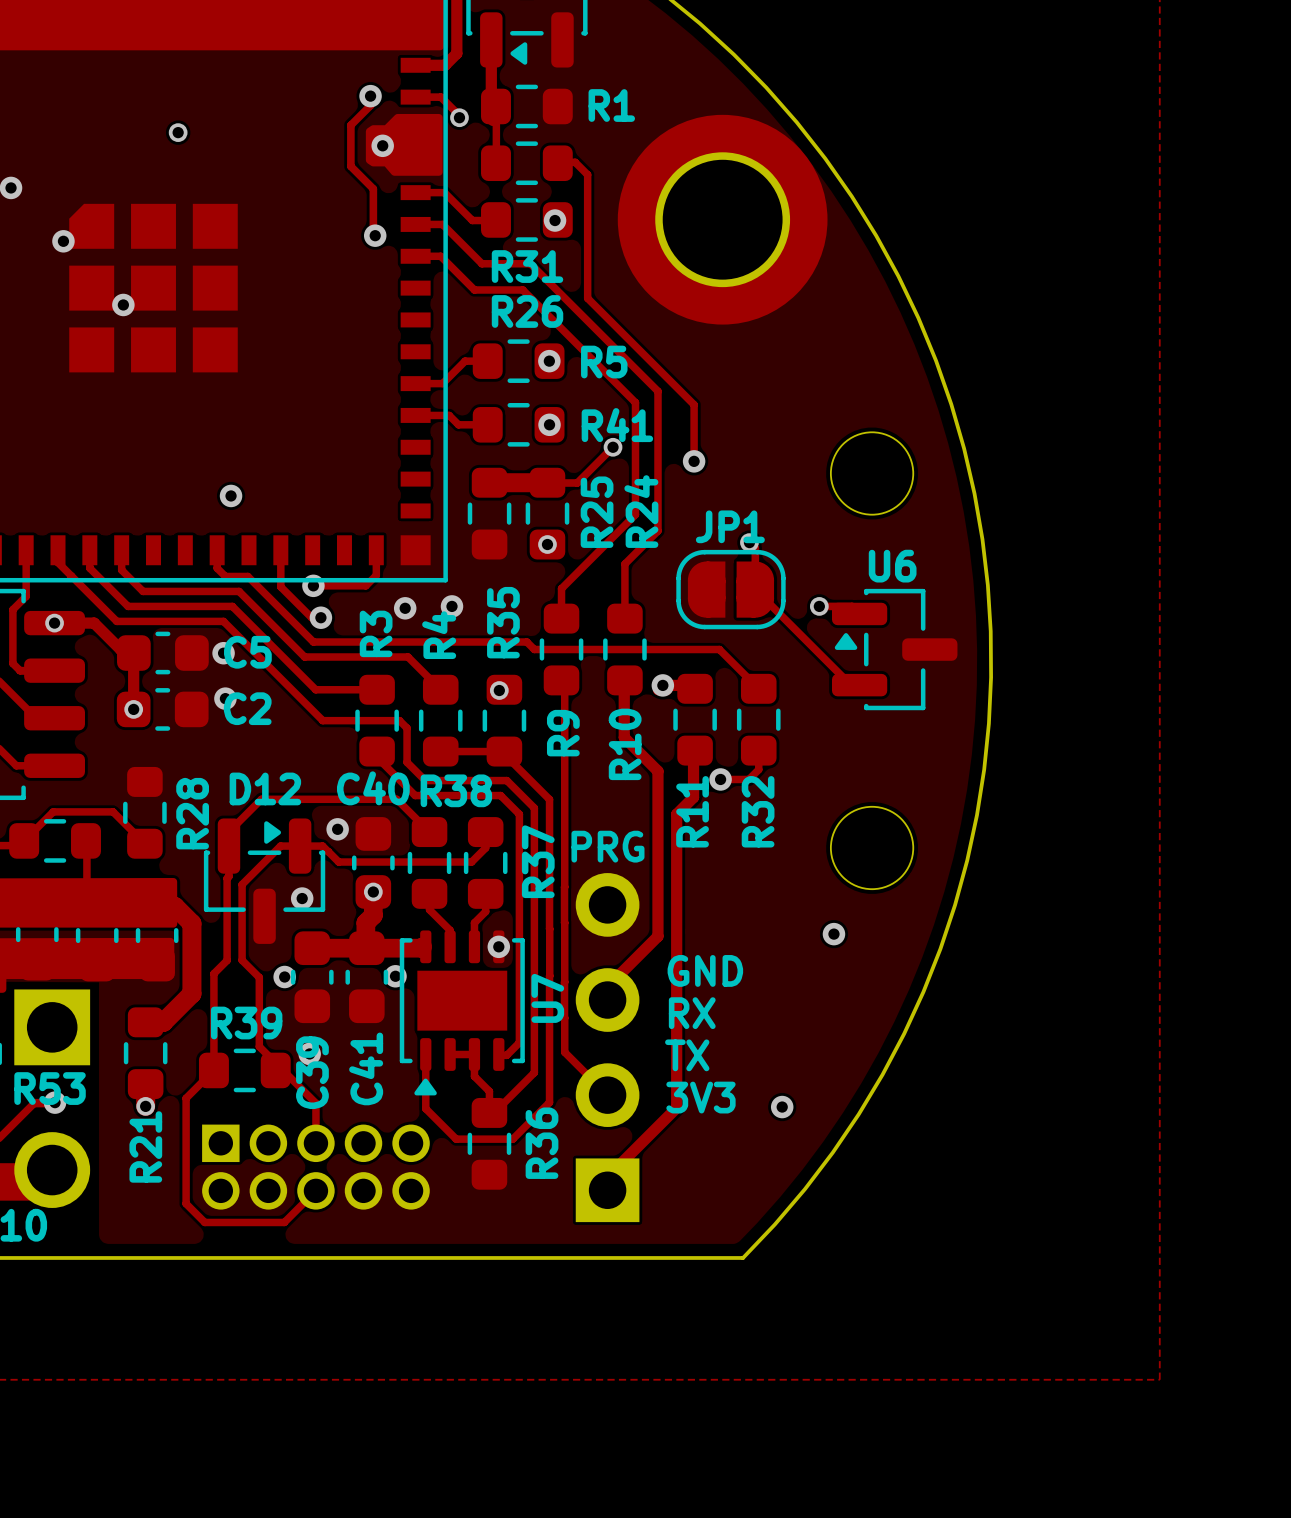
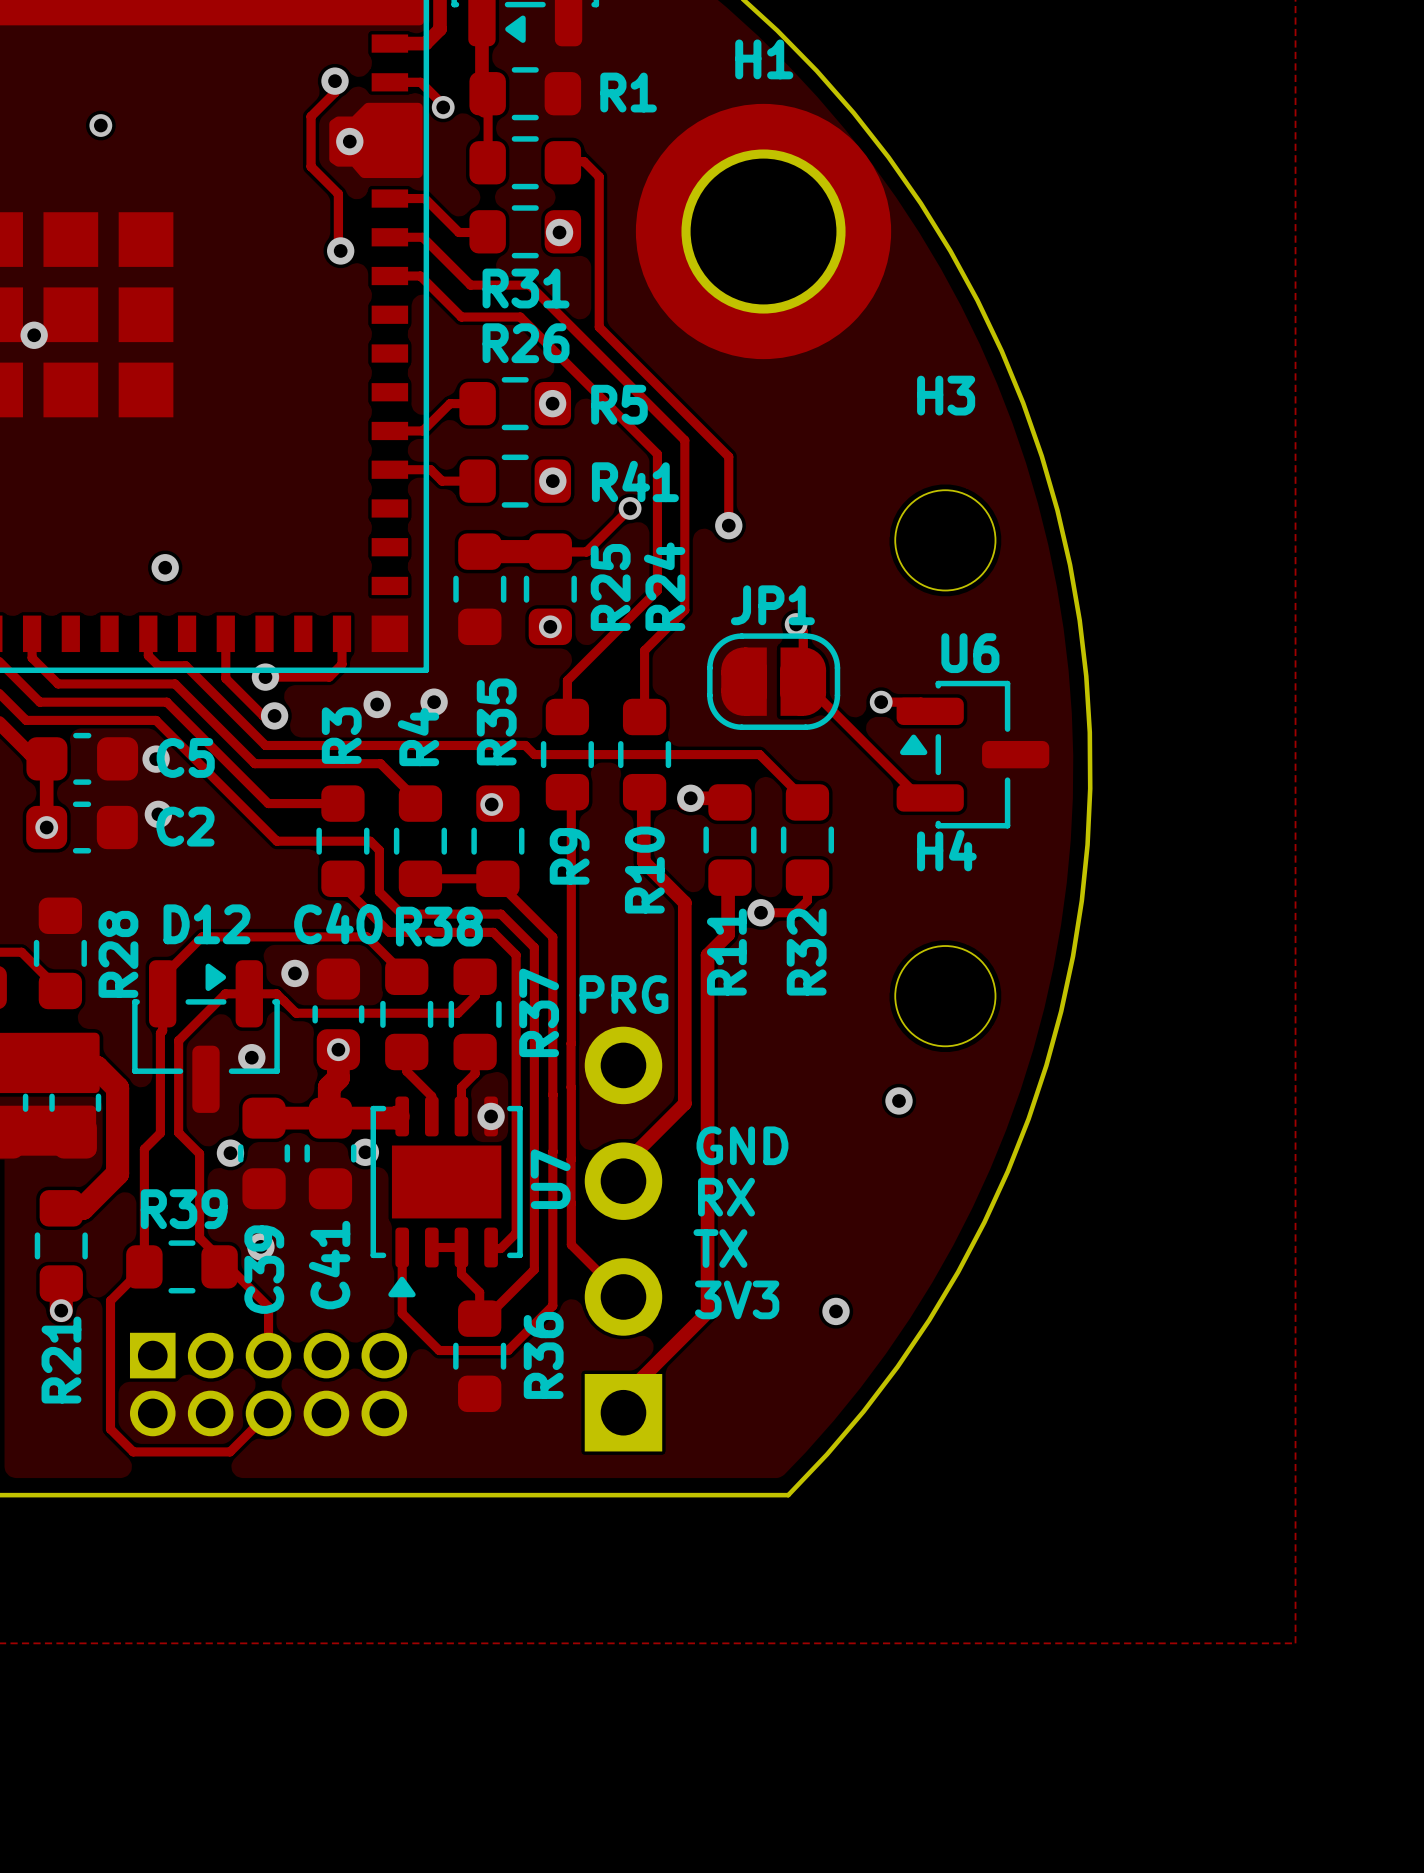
H1 name: none -> H1 (764, 59)
H3 name: none -> H3 (946, 395)
H4 name: none -> H4 (946, 850)

